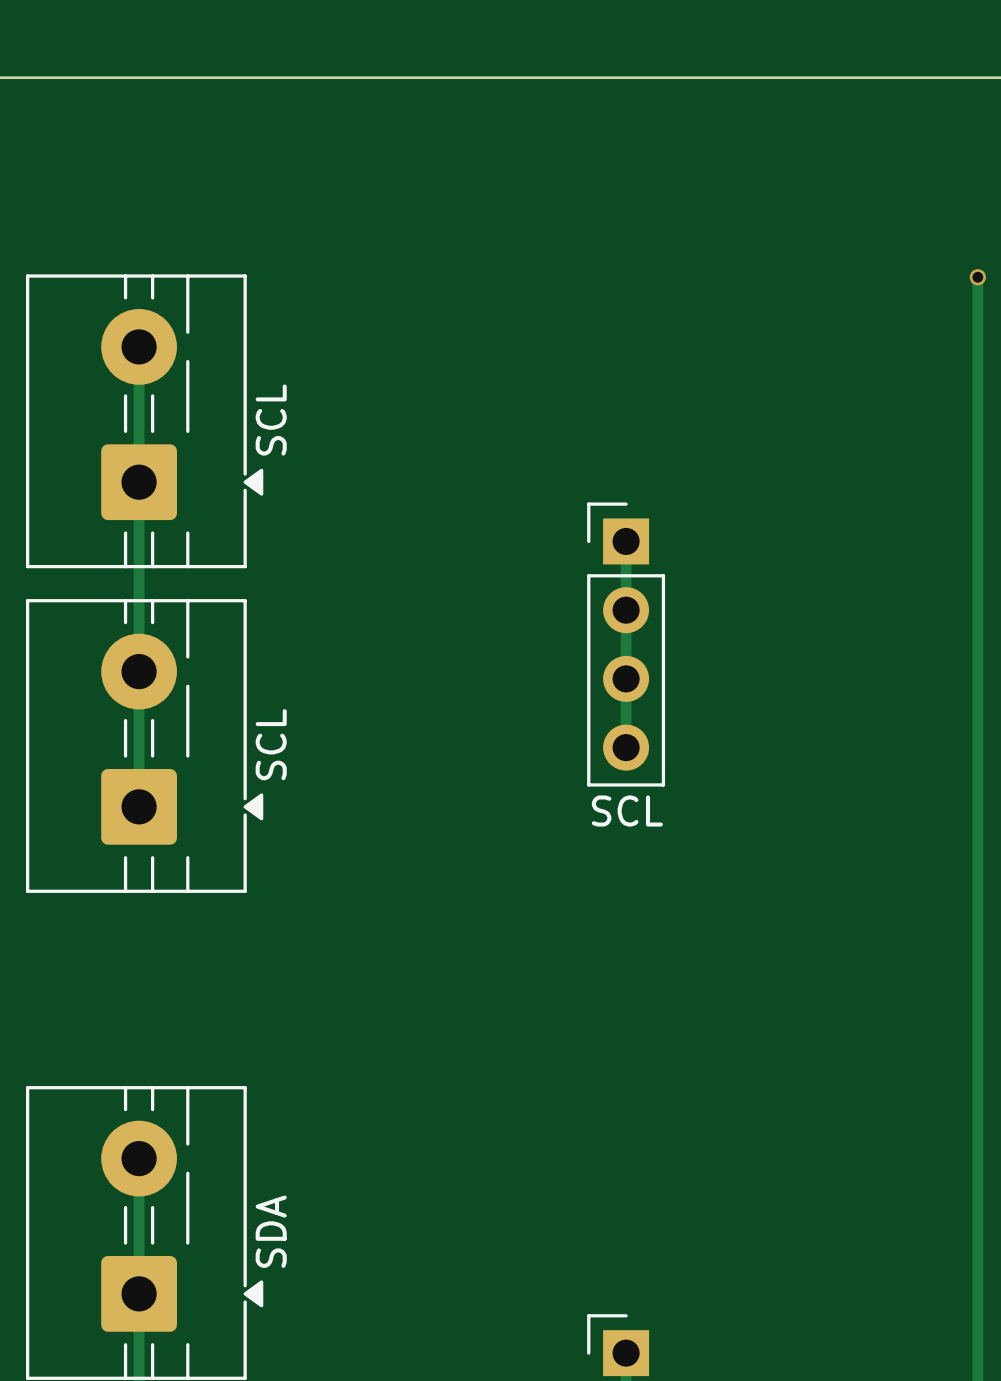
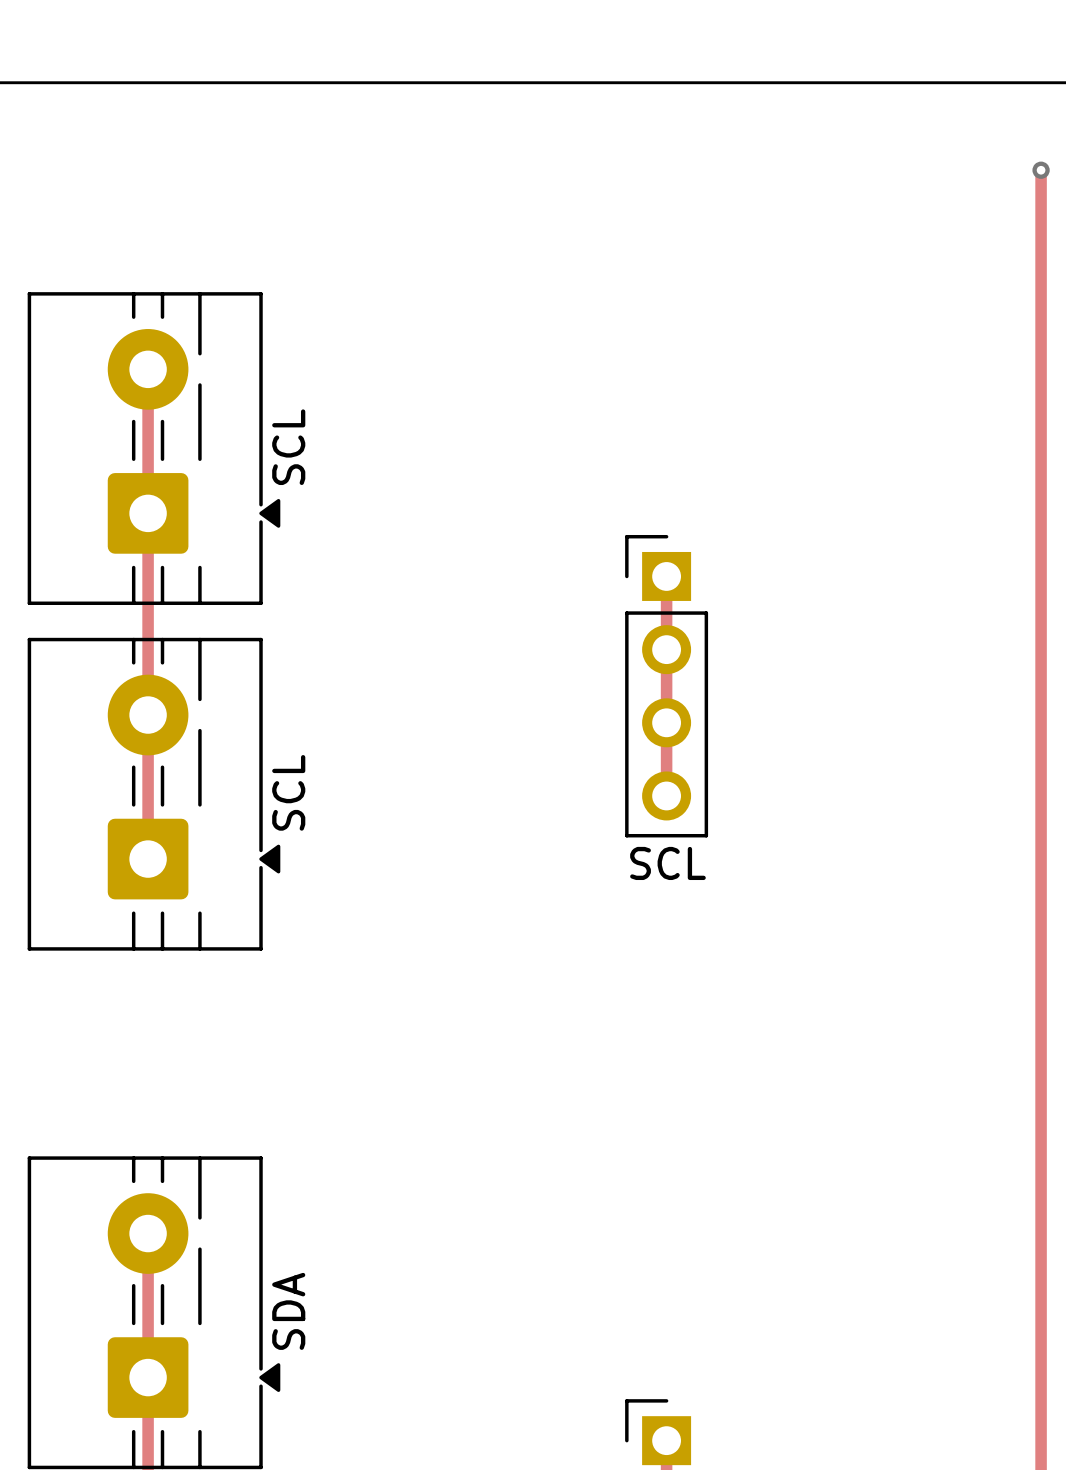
track: none -> (1041, 170) (1041, 295)
via: none -> (1041, 170)
via: (977, 277) -> none

